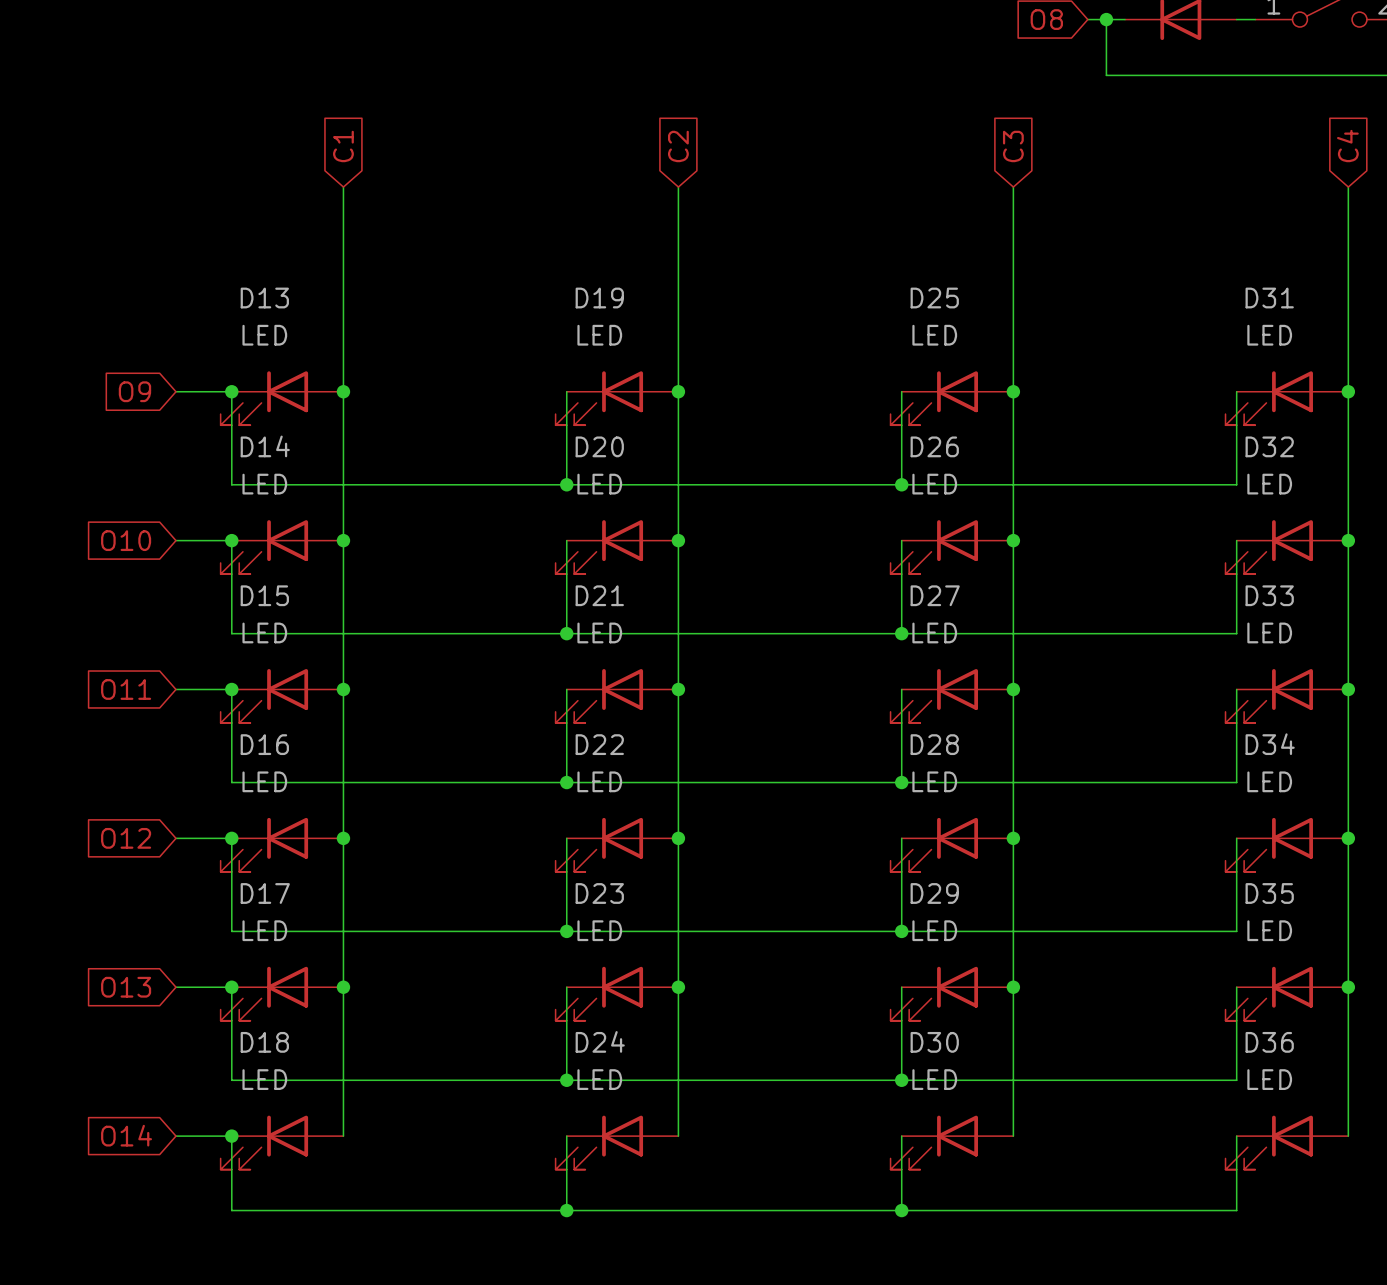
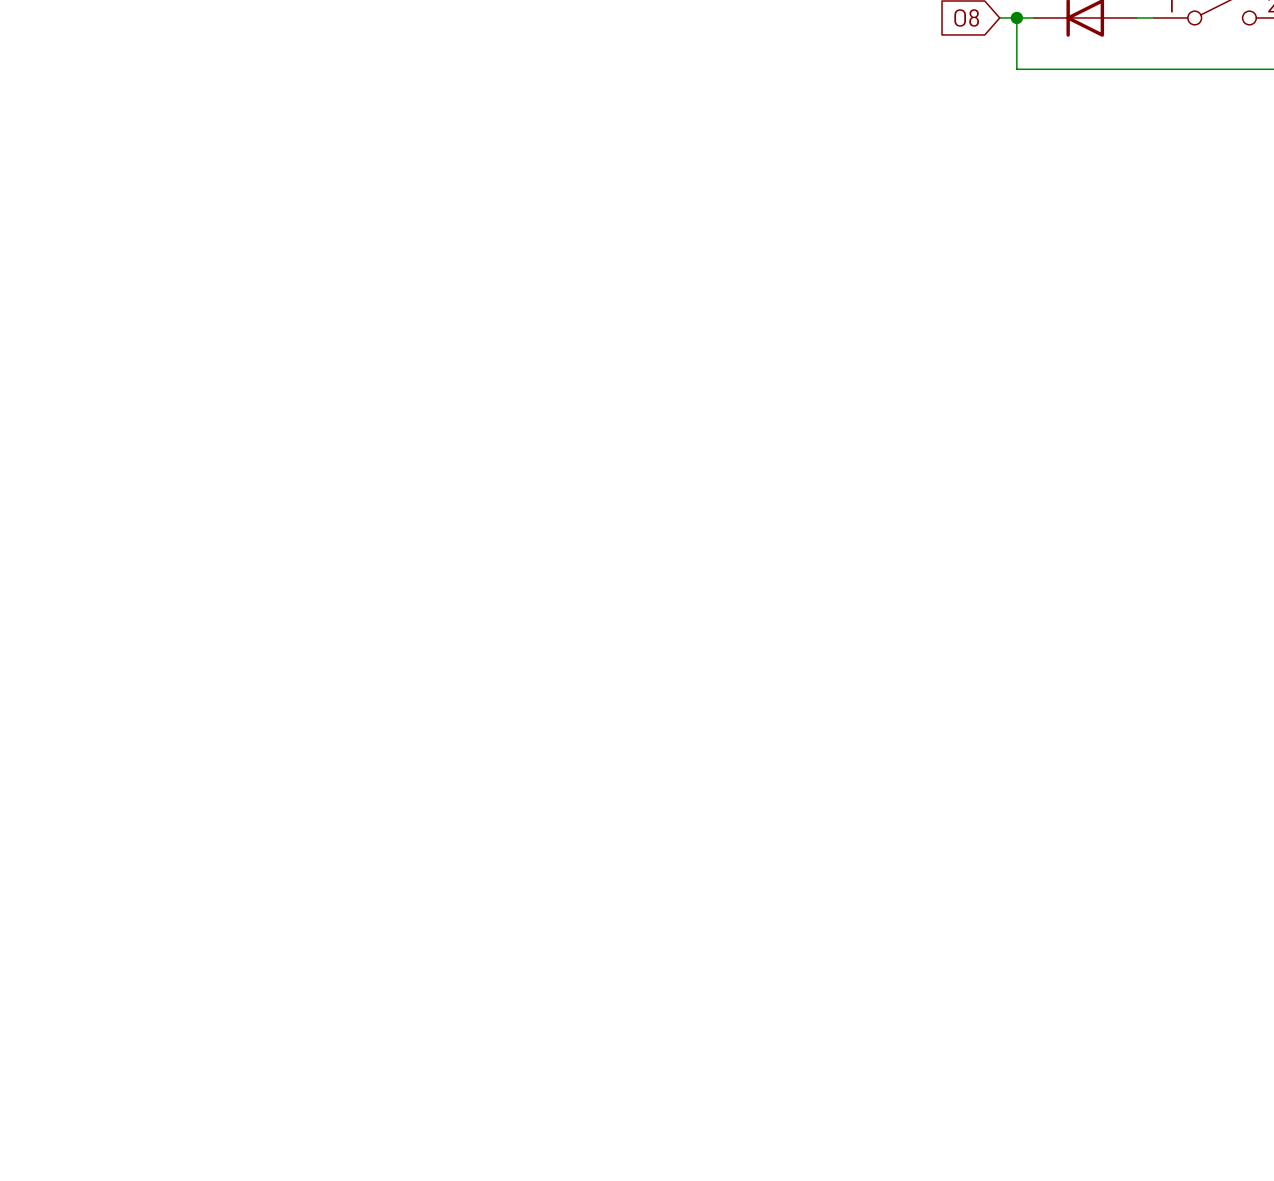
global label: C1 (343, 146) -> none
global label: C2 (678, 146) -> none
global label: C3 (1013, 146) -> none
global label: C4 (1347, 146) -> none
wire: (343, 187) (343, 1136) -> none
wire: (678, 187) (678, 1136) -> none
wire: (1013, 187) (1013, 1136) -> none
wire: (1348, 187) (1348, 1136) -> none
global label: O9 (134, 391) -> none
wire: (175, 391) (231, 391) (231, 484) (1236, 484) (1236, 391) -> none
junction: (231, 391) -> none
junction: (343, 391) -> none
wire: (566, 391) (566, 484) -> none
junction: (678, 391) -> none
wire: (901, 391) (901, 484) -> none
junction: (1013, 391) -> none
junction: (1348, 391) -> none
D13: LED (282, 398) -> none
D19: LED (617, 398) -> none
D25: LED (951, 398) -> none
D31: LED (1286, 398) -> none
junction: (566, 484) -> none
junction: (901, 484) -> none
global label: O10 (126, 540) -> none
wire: (175, 540) (231, 540) (231, 633) (1236, 633) (1236, 540) -> none
junction: (231, 540) -> none
junction: (343, 540) -> none
wire: (566, 540) (566, 633) -> none
junction: (678, 540) -> none
wire: (901, 540) (901, 633) -> none
junction: (1013, 540) -> none
junction: (1348, 540) -> none
D14: LED (282, 547) -> none
D20: LED (617, 547) -> none
D26: LED (951, 547) -> none
D32: LED (1286, 547) -> none
junction: (566, 633) -> none
junction: (901, 633) -> none
global label: O11 (126, 689) -> none
wire: (175, 689) (231, 689) (231, 782) (1236, 782) (1236, 689) -> none
junction: (231, 689) -> none
junction: (343, 689) -> none
wire: (566, 689) (566, 782) -> none
junction: (678, 689) -> none
wire: (901, 689) (901, 782) -> none
junction: (1013, 689) -> none
junction: (1348, 689) -> none
D15: LED (282, 696) -> none
D21: LED (617, 696) -> none
D27: LED (951, 696) -> none
D33: LED (1286, 696) -> none
junction: (566, 782) -> none
junction: (901, 782) -> none
global label: O12 (126, 838) -> none
wire: (175, 838) (231, 838) (231, 931) (1236, 931) (1236, 838) -> none
junction: (231, 838) -> none
junction: (343, 838) -> none
wire: (566, 838) (566, 931) -> none
junction: (678, 838) -> none
wire: (901, 838) (901, 931) -> none
junction: (1013, 838) -> none
junction: (1348, 838) -> none
D16: LED (282, 844) -> none
D22: LED (617, 844) -> none
D28: LED (951, 844) -> none
D34: LED (1286, 844) -> none
junction: (566, 931) -> none
junction: (901, 931) -> none
global label: O13 (126, 987) -> none
wire: (175, 987) (231, 987) (231, 1080) (1236, 1080) (1236, 987) -> none
junction: (231, 987) -> none
junction: (343, 987) -> none
wire: (566, 987) (566, 1080) -> none
junction: (678, 987) -> none
wire: (901, 987) (901, 1080) -> none
junction: (1013, 987) -> none
junction: (1348, 987) -> none
D17: LED (282, 993) -> none
D23: LED (617, 993) -> none
D29: LED (951, 993) -> none
D35: LED (1286, 993) -> none
junction: (566, 1080) -> none
junction: (901, 1080) -> none
global label: O14 (126, 1135) -> none
wire: (175, 1136) (231, 1136) (231, 1210) (1236, 1210) (1236, 1136) -> none
junction: (231, 1136) -> none
wire: (566, 1136) (566, 1210) -> none
wire: (901, 1136) (901, 1210) -> none
D18: LED (282, 1142) -> none
D24: LED (617, 1142) -> none
D30: LED (951, 1142) -> none
D36: LED (1286, 1142) -> none
junction: (566, 1210) -> none
junction: (901, 1210) -> none

